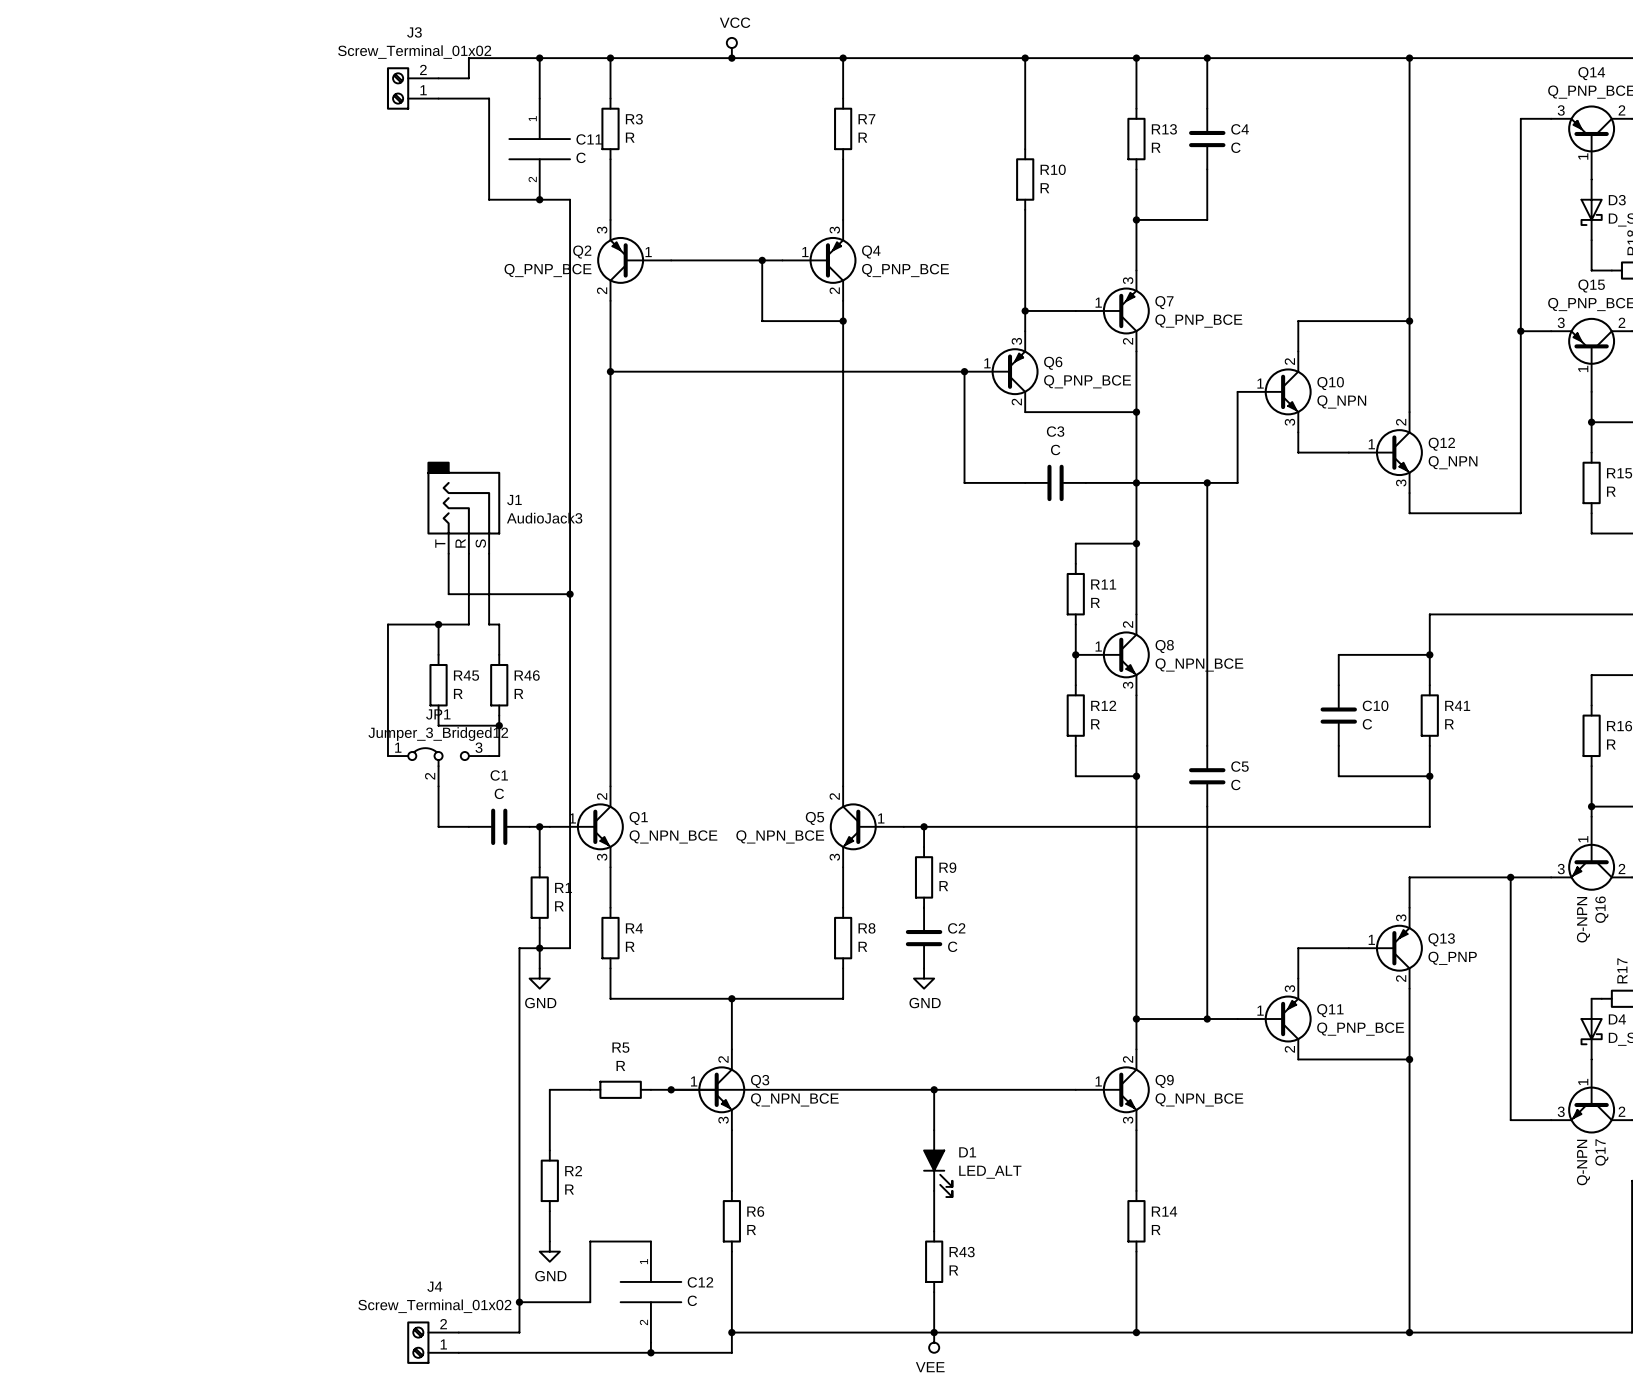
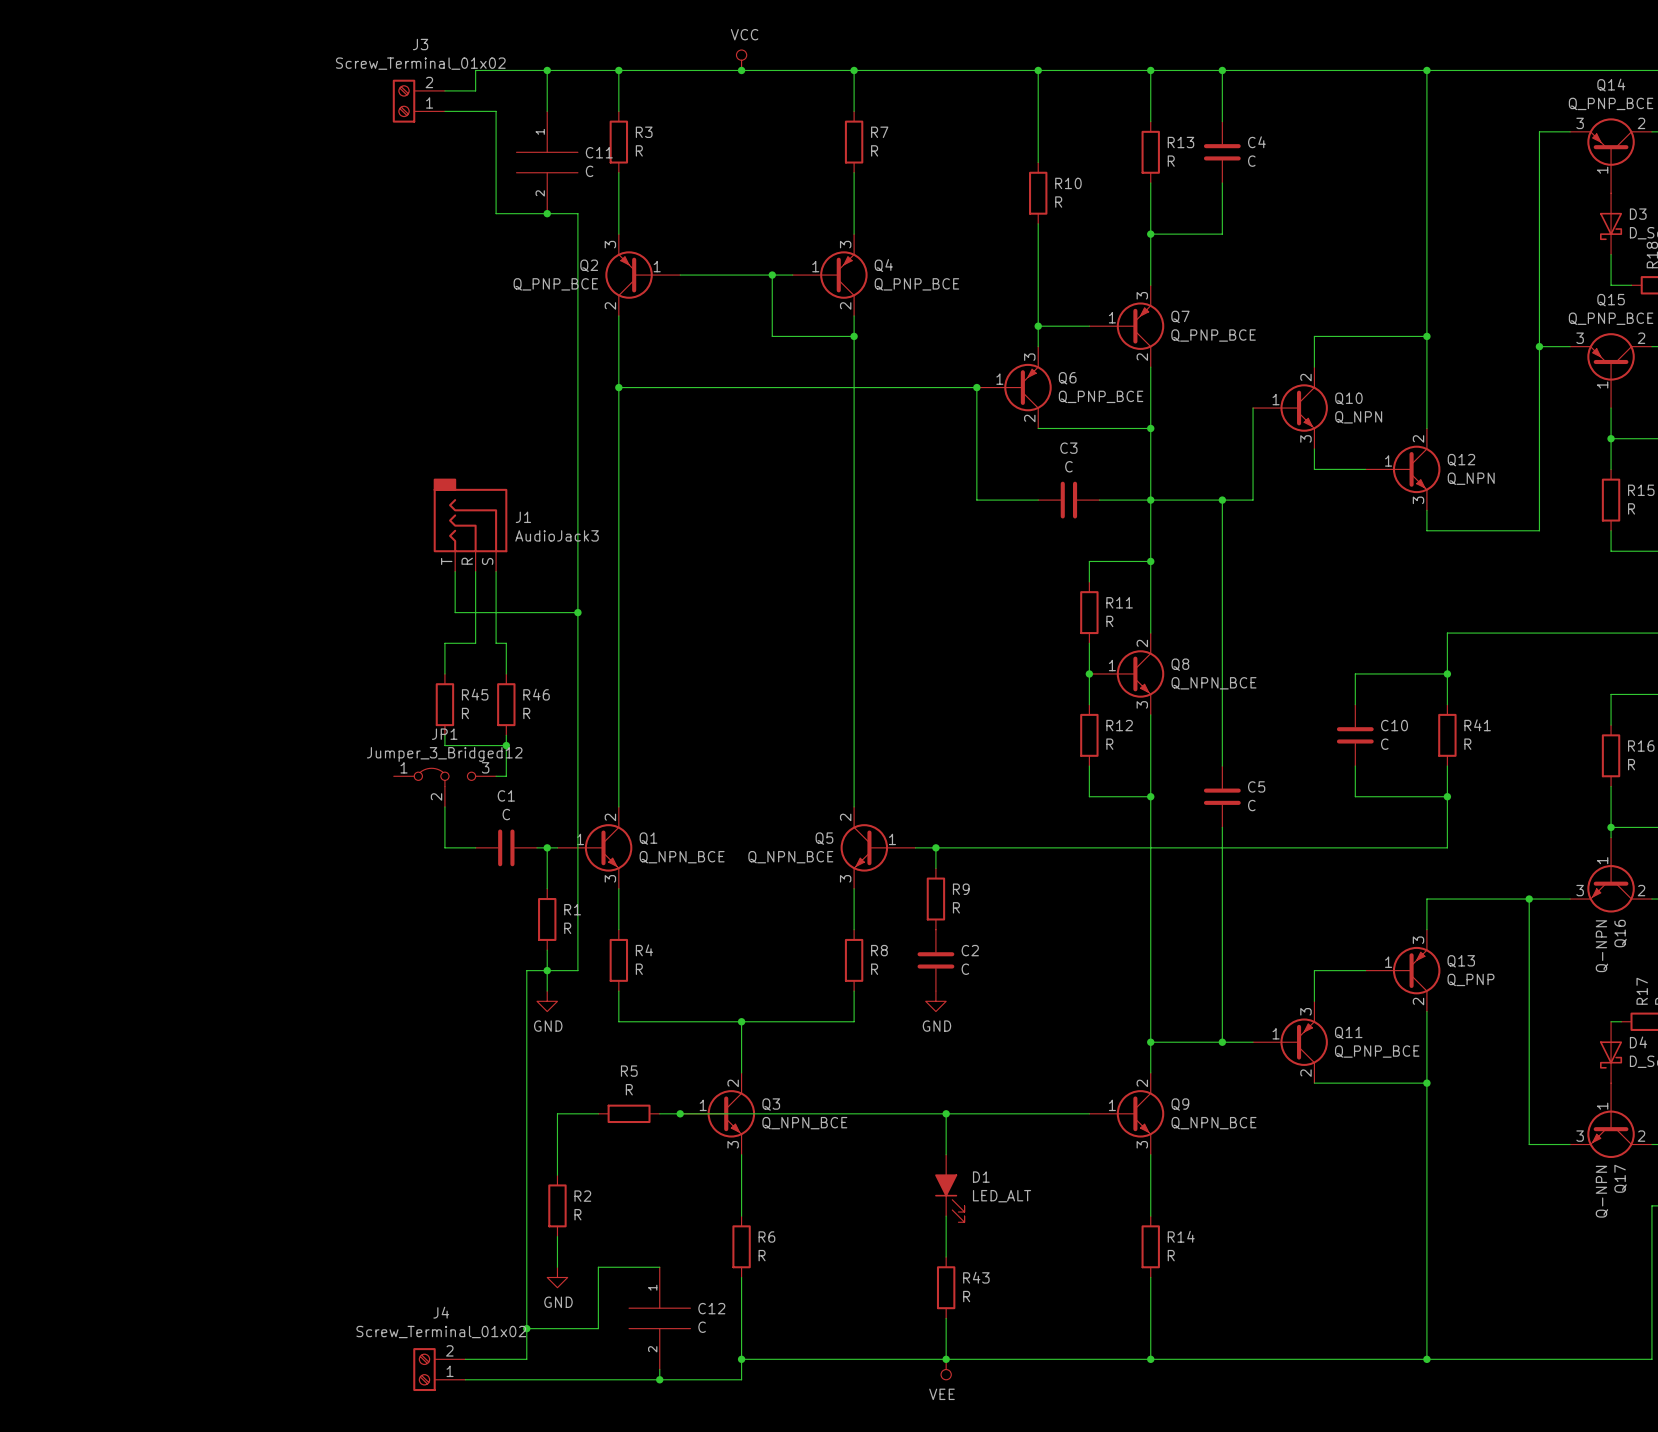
wire: (438, 624) (387, 624) (387, 756) -> none
junction: (438, 624) -> none

